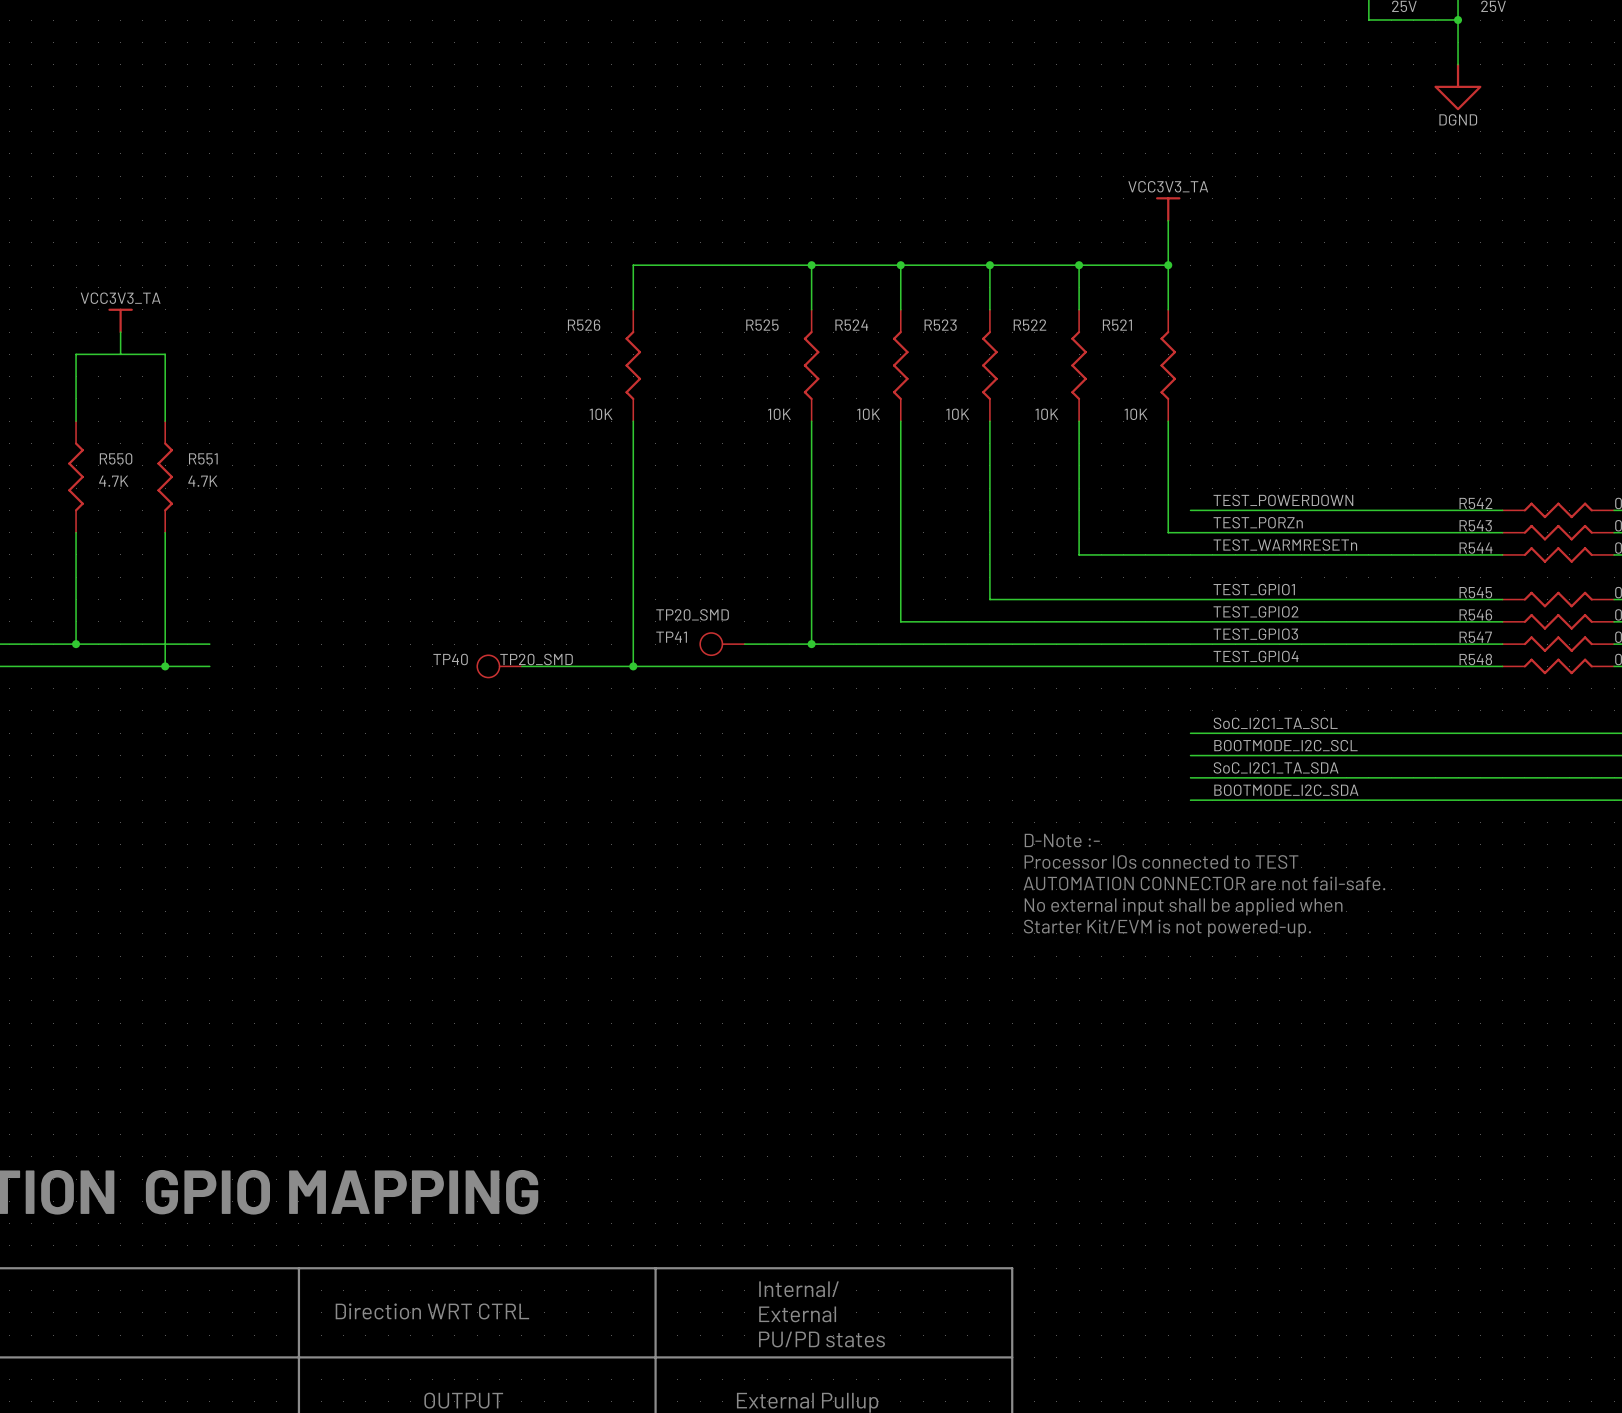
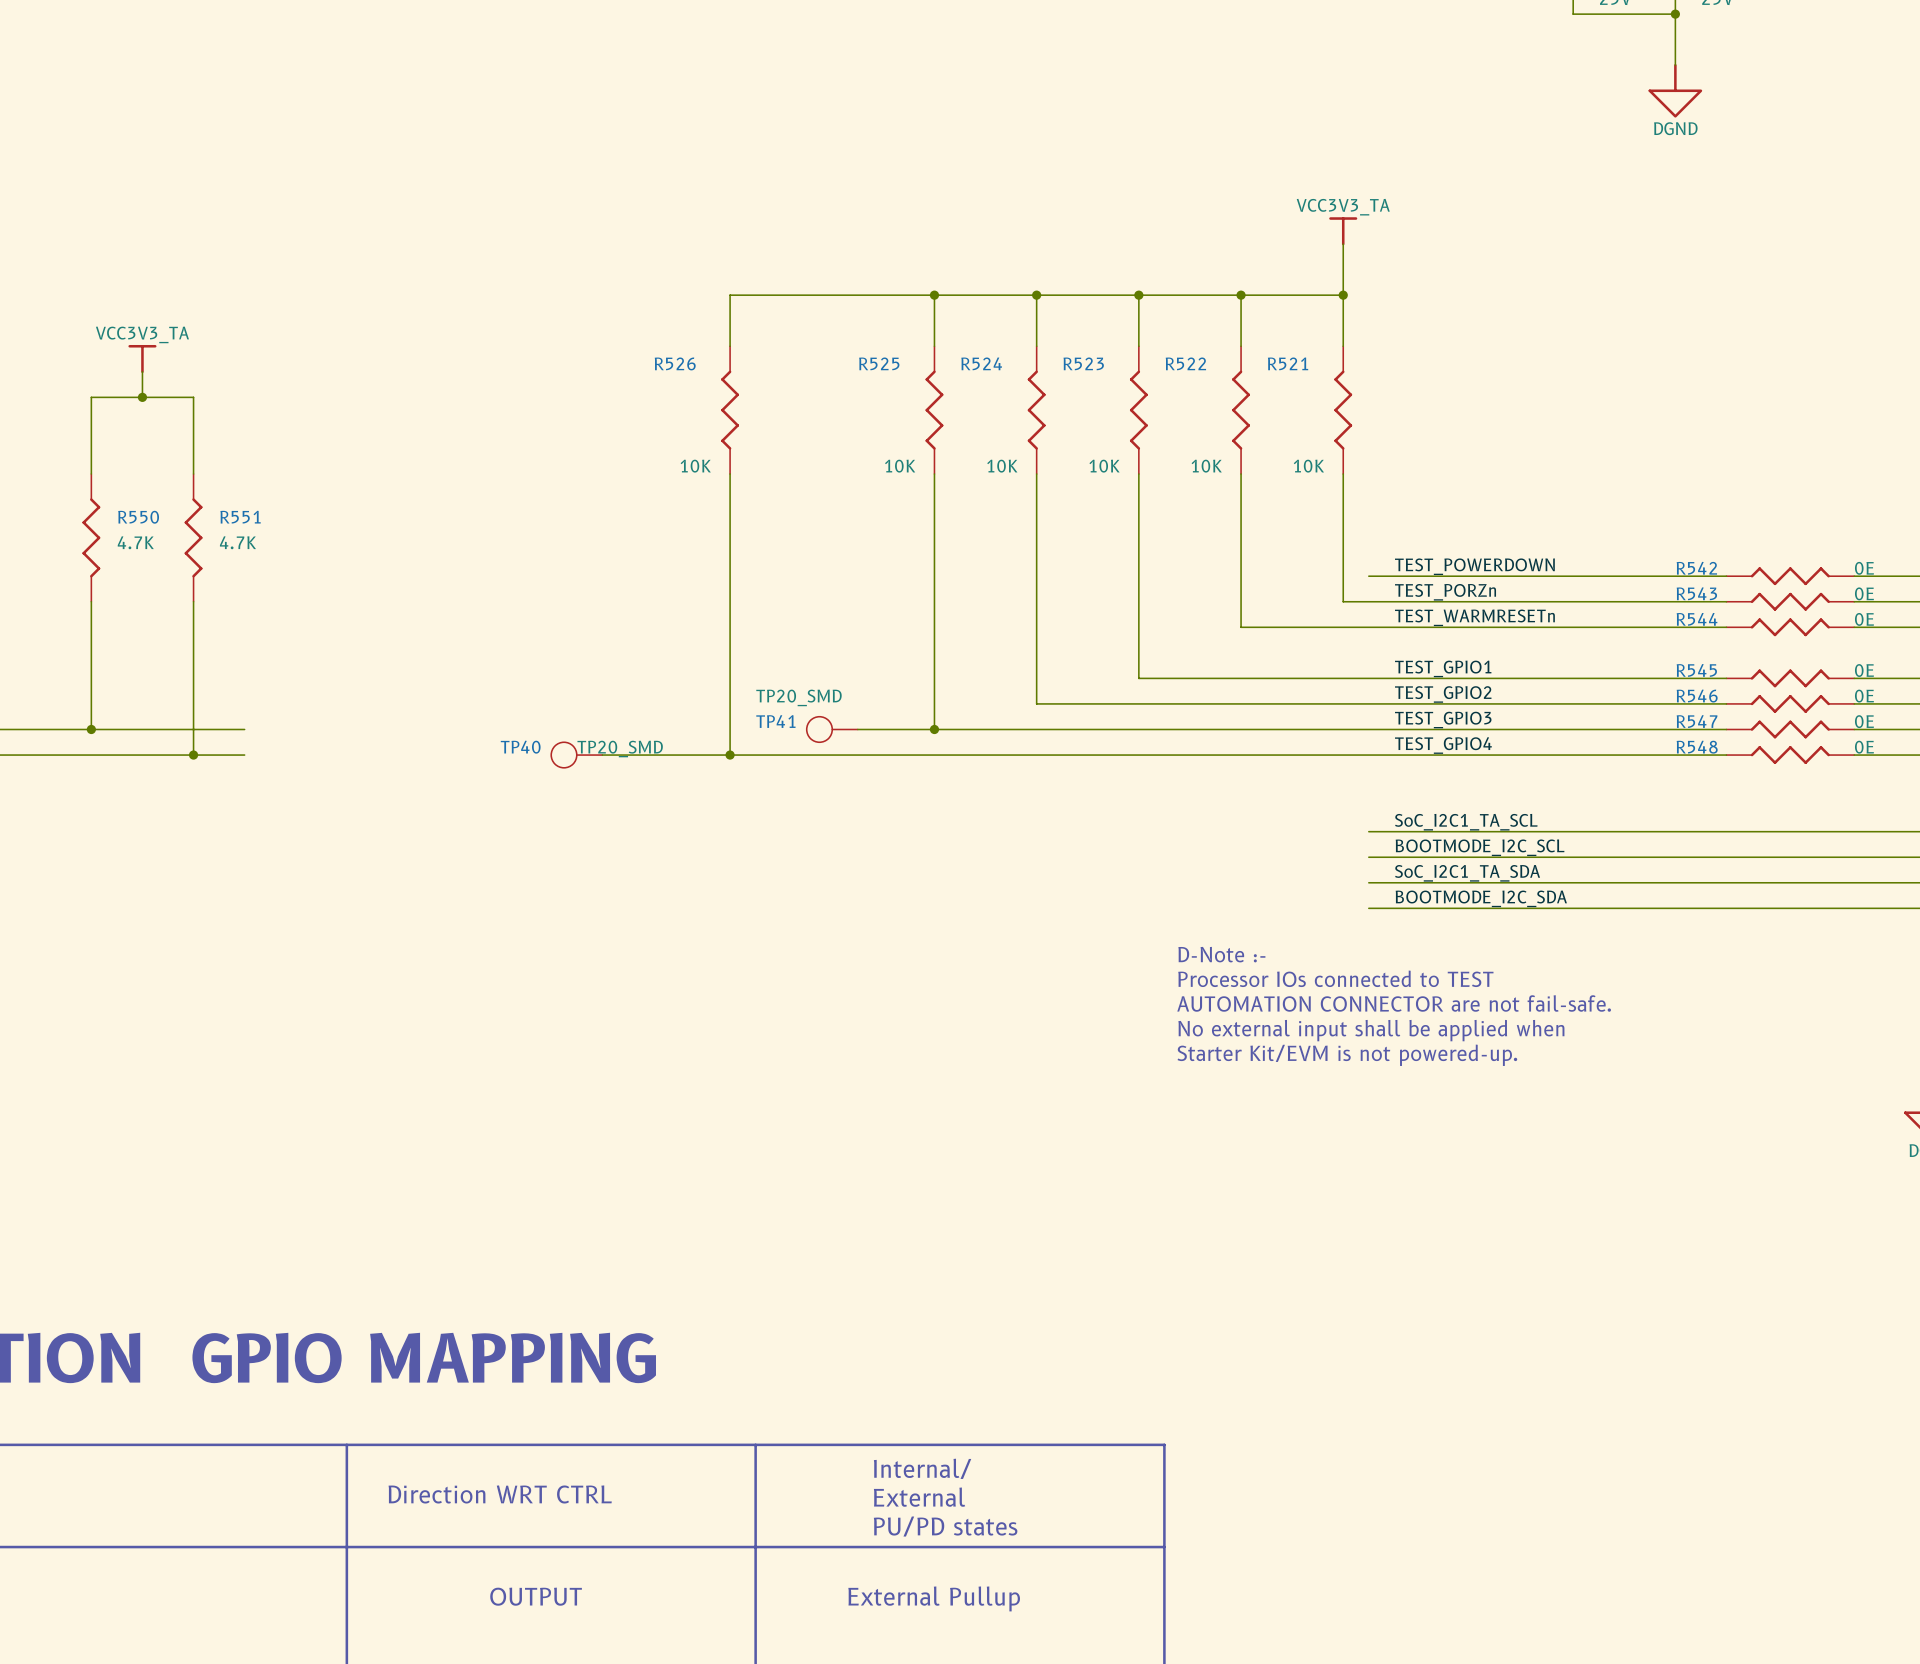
junction: none -> (142, 397)

